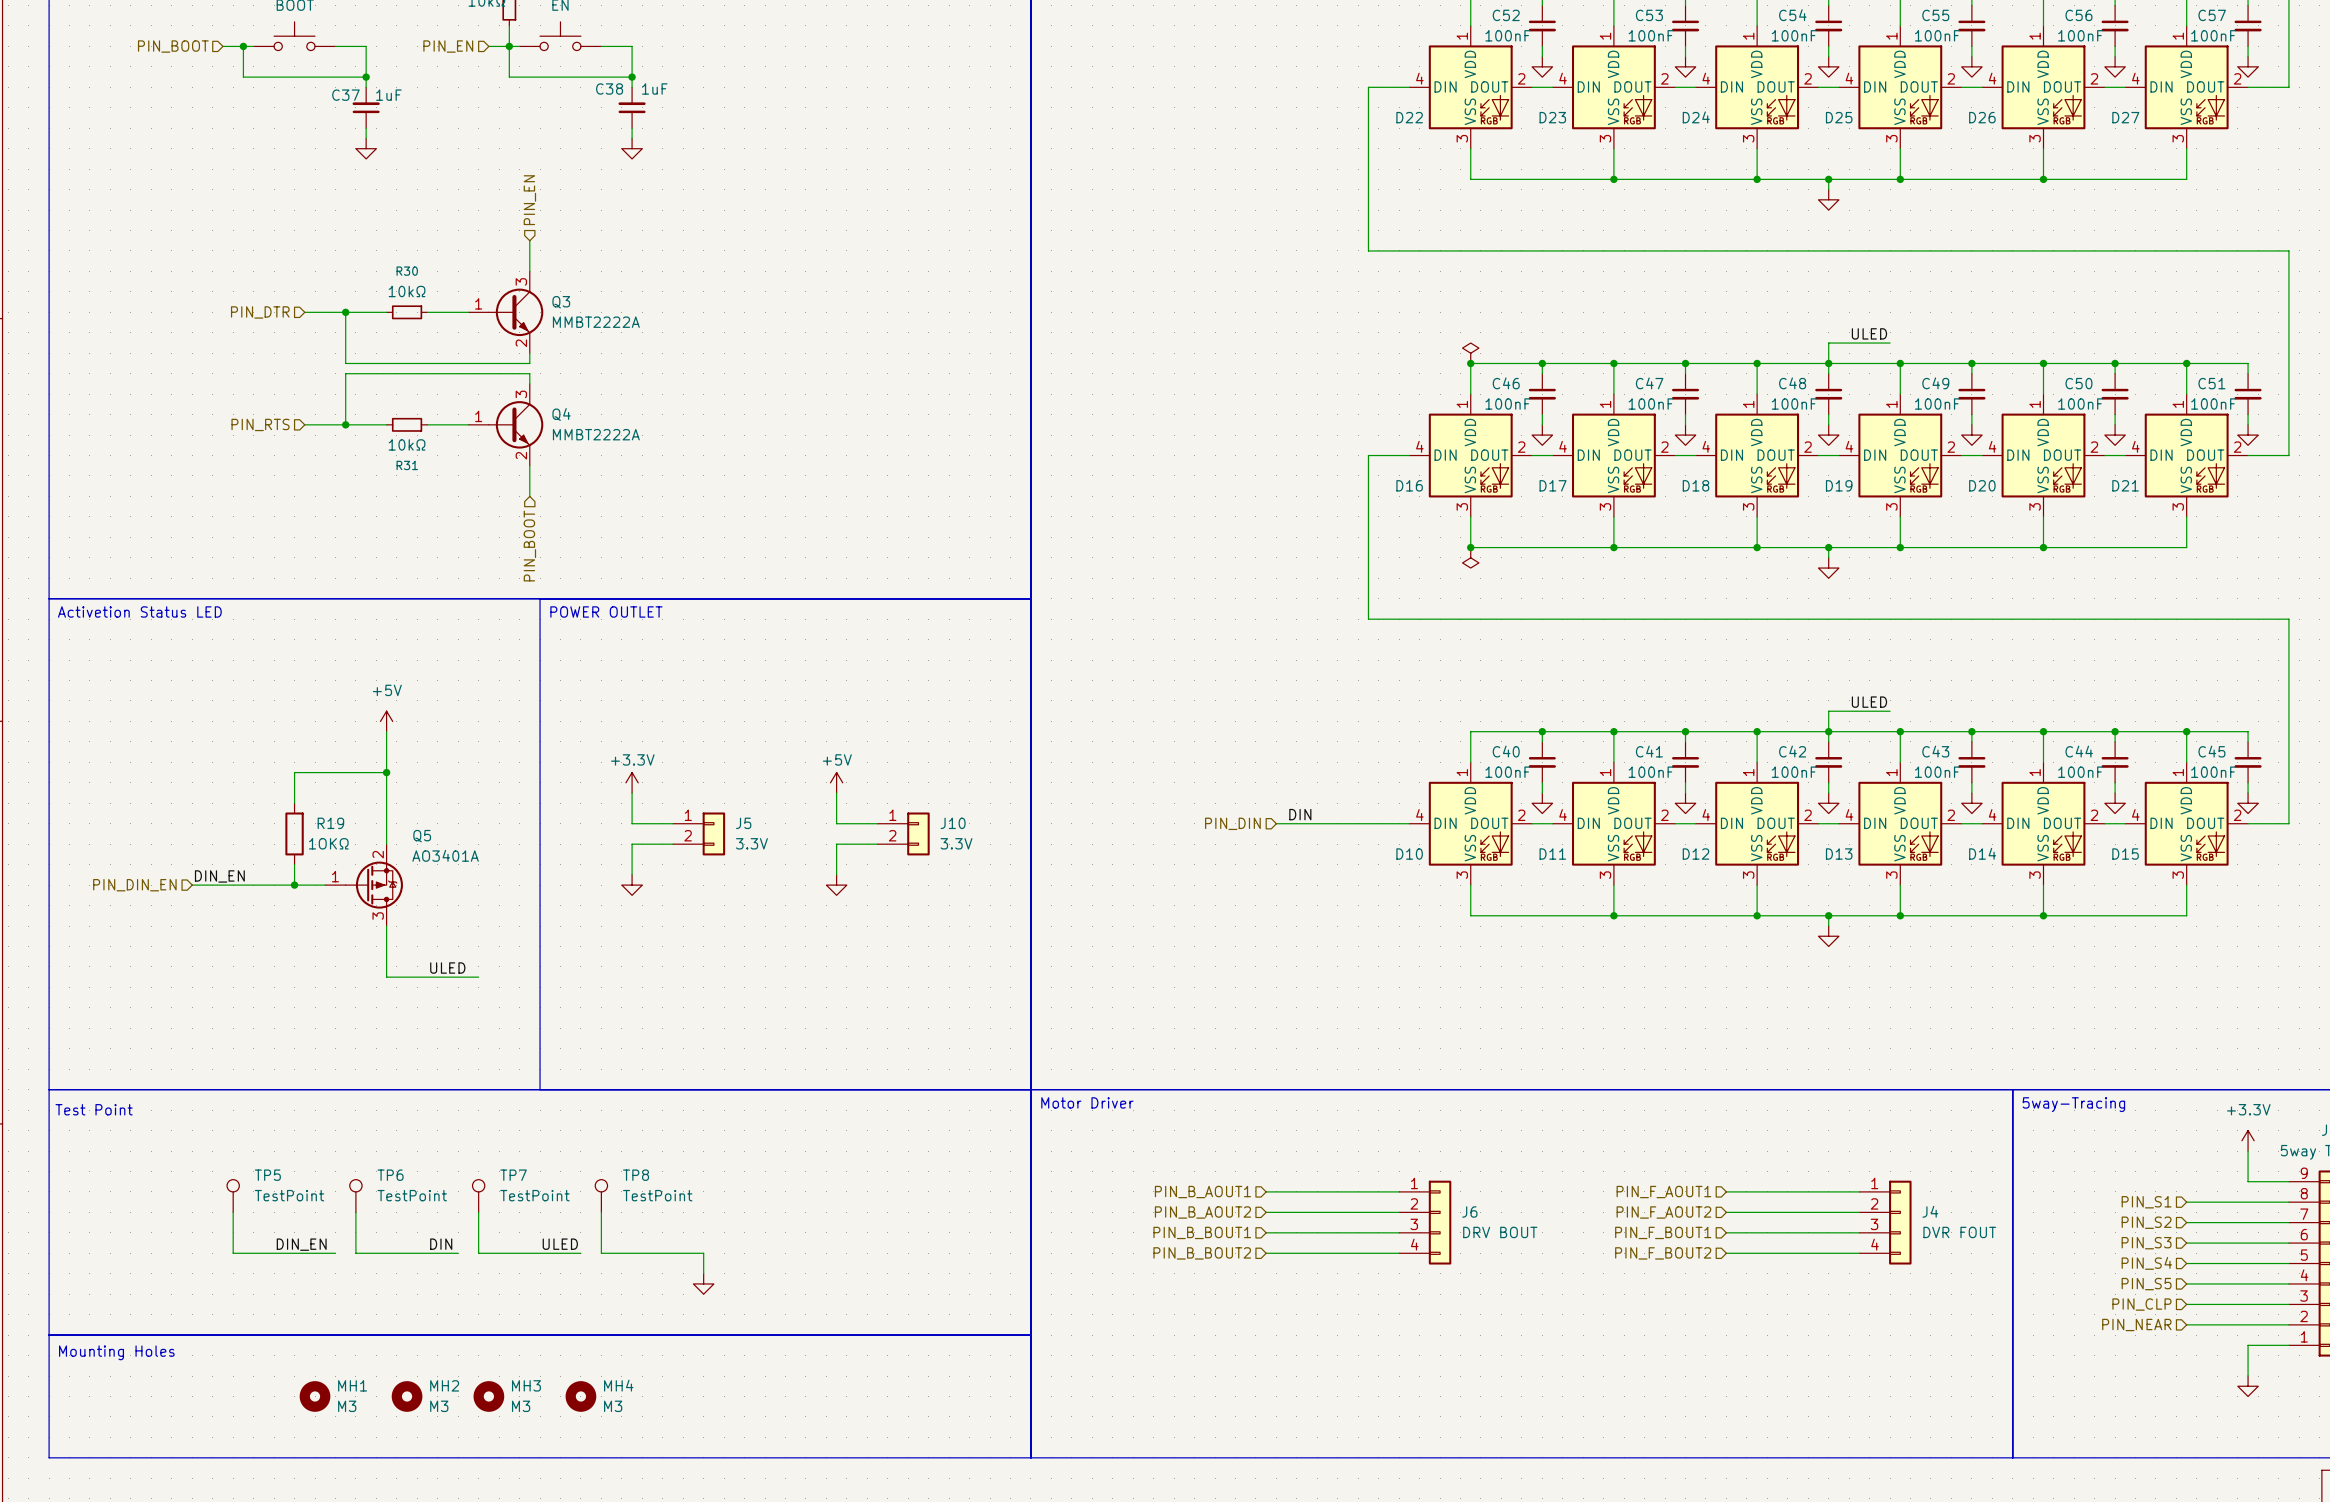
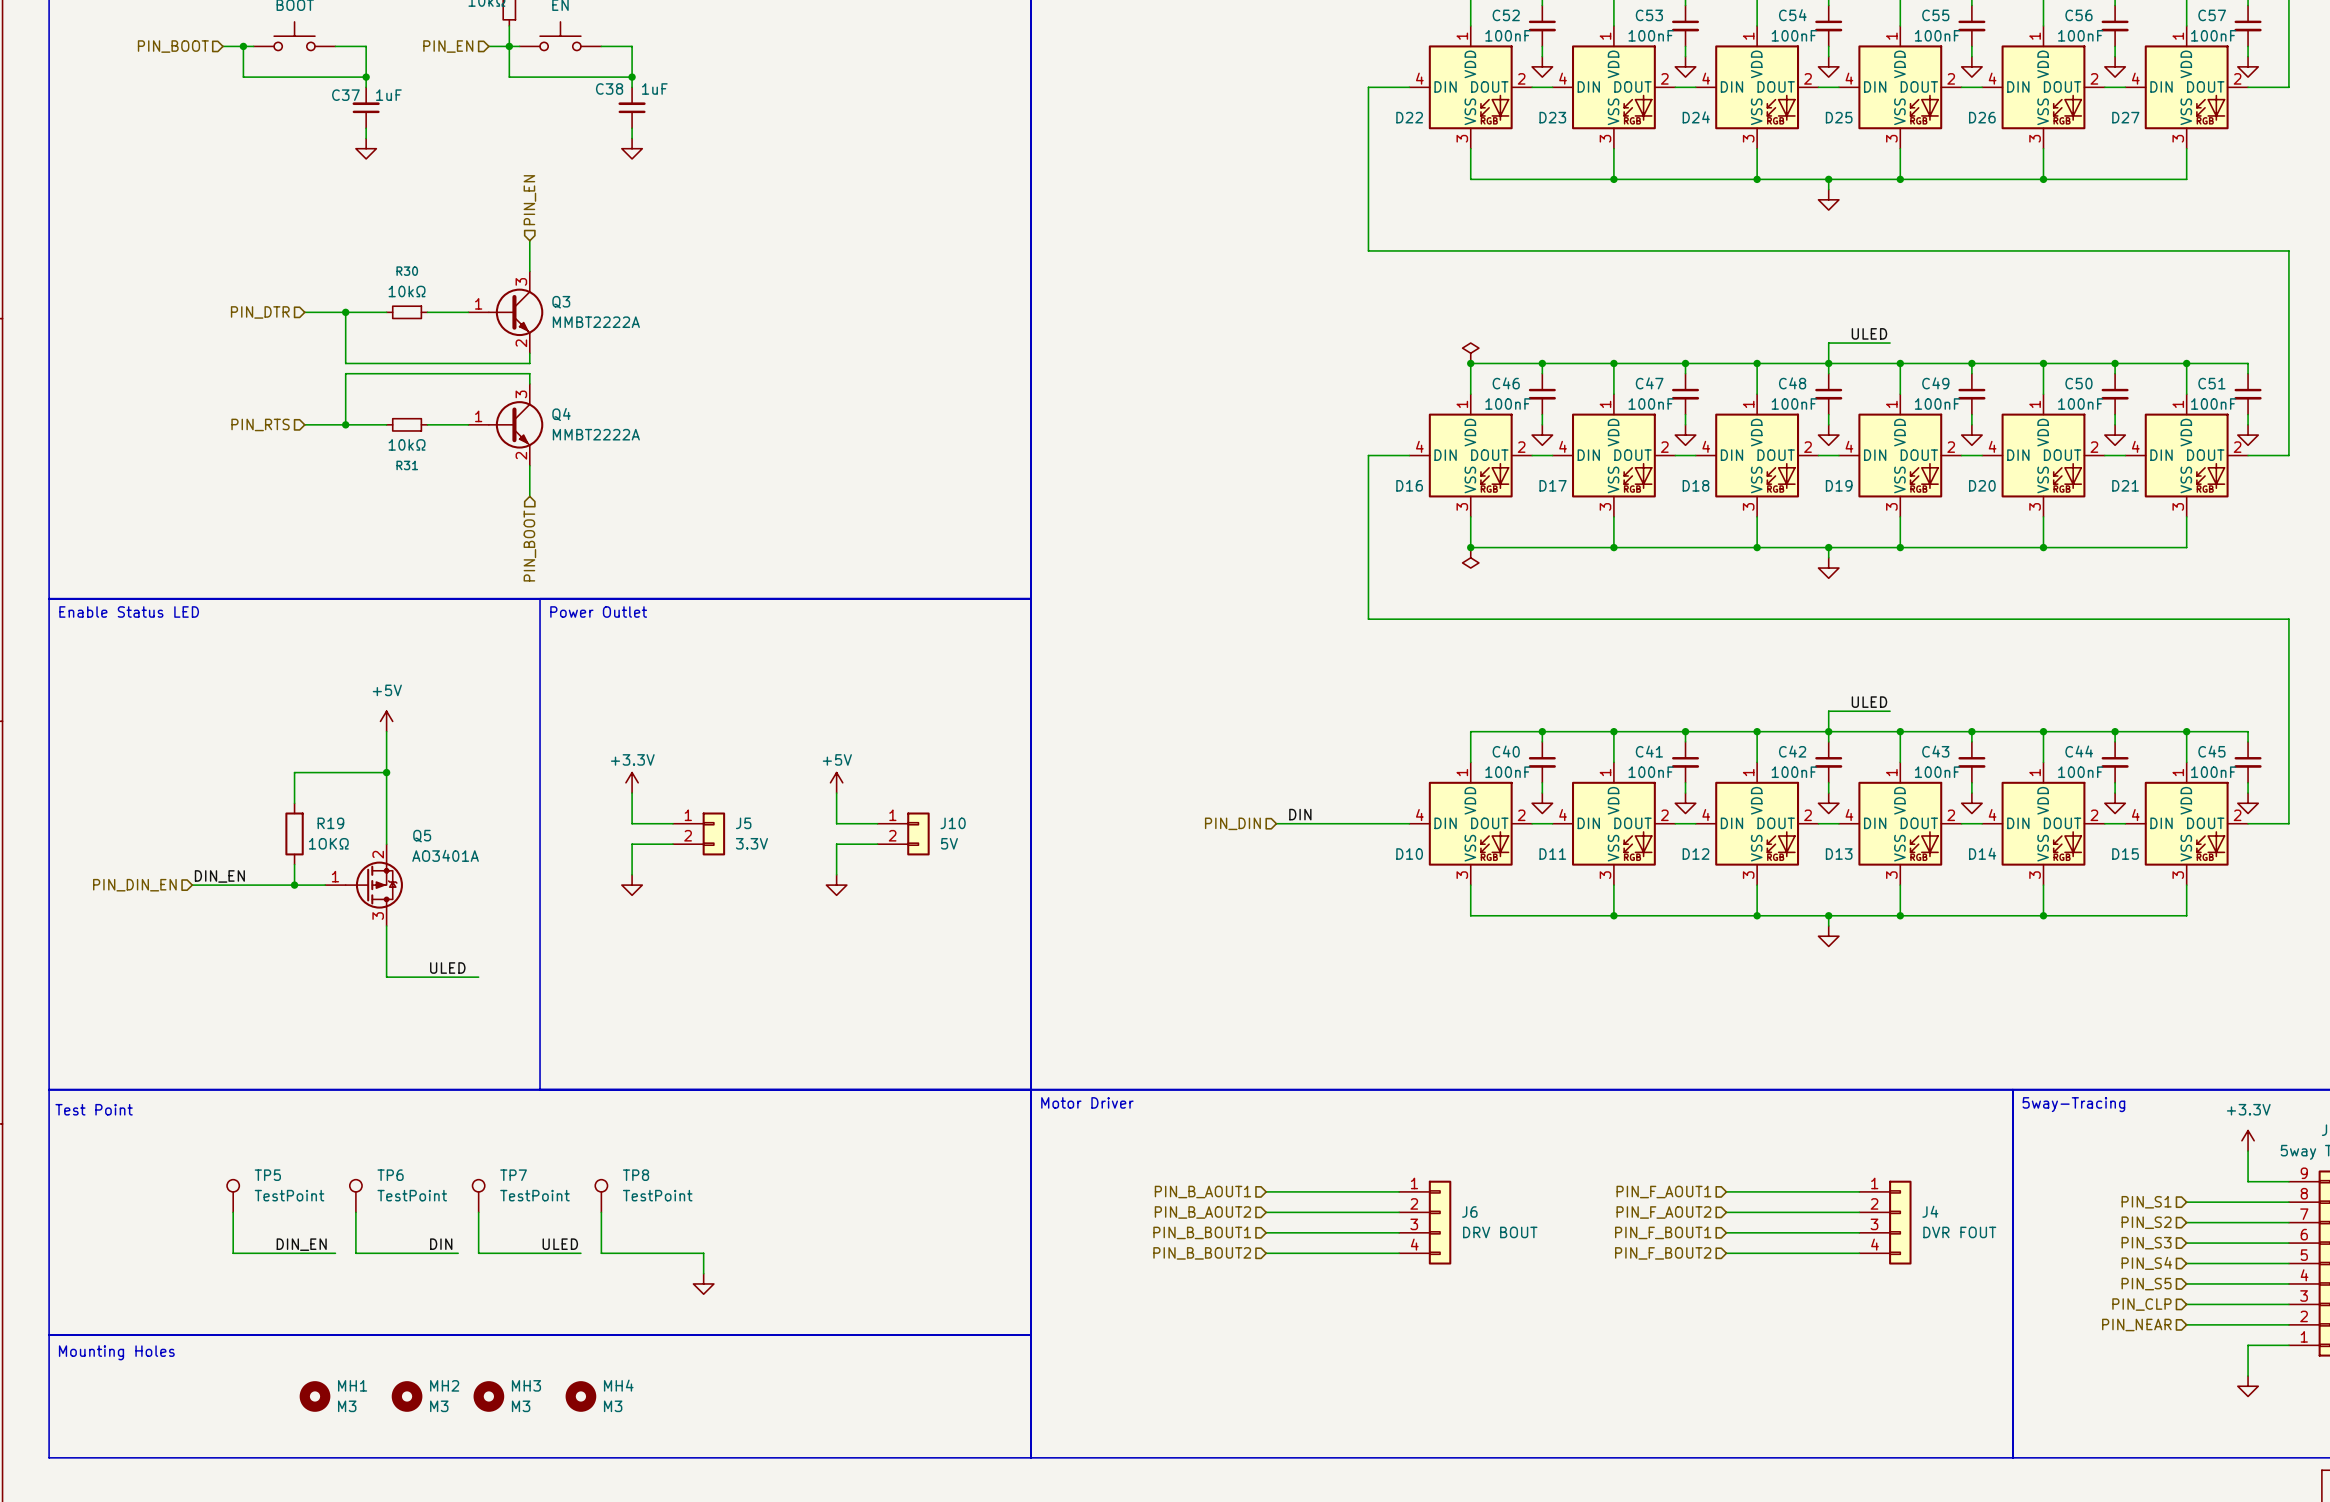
text: Activetion Status LED (139, 611) -> Enable Status LED (129, 611)
text: POWER OUTLET (606, 611) -> Power Outlet (598, 611)
J10 value: 3.3V (956, 843) -> 5V (949, 843)

